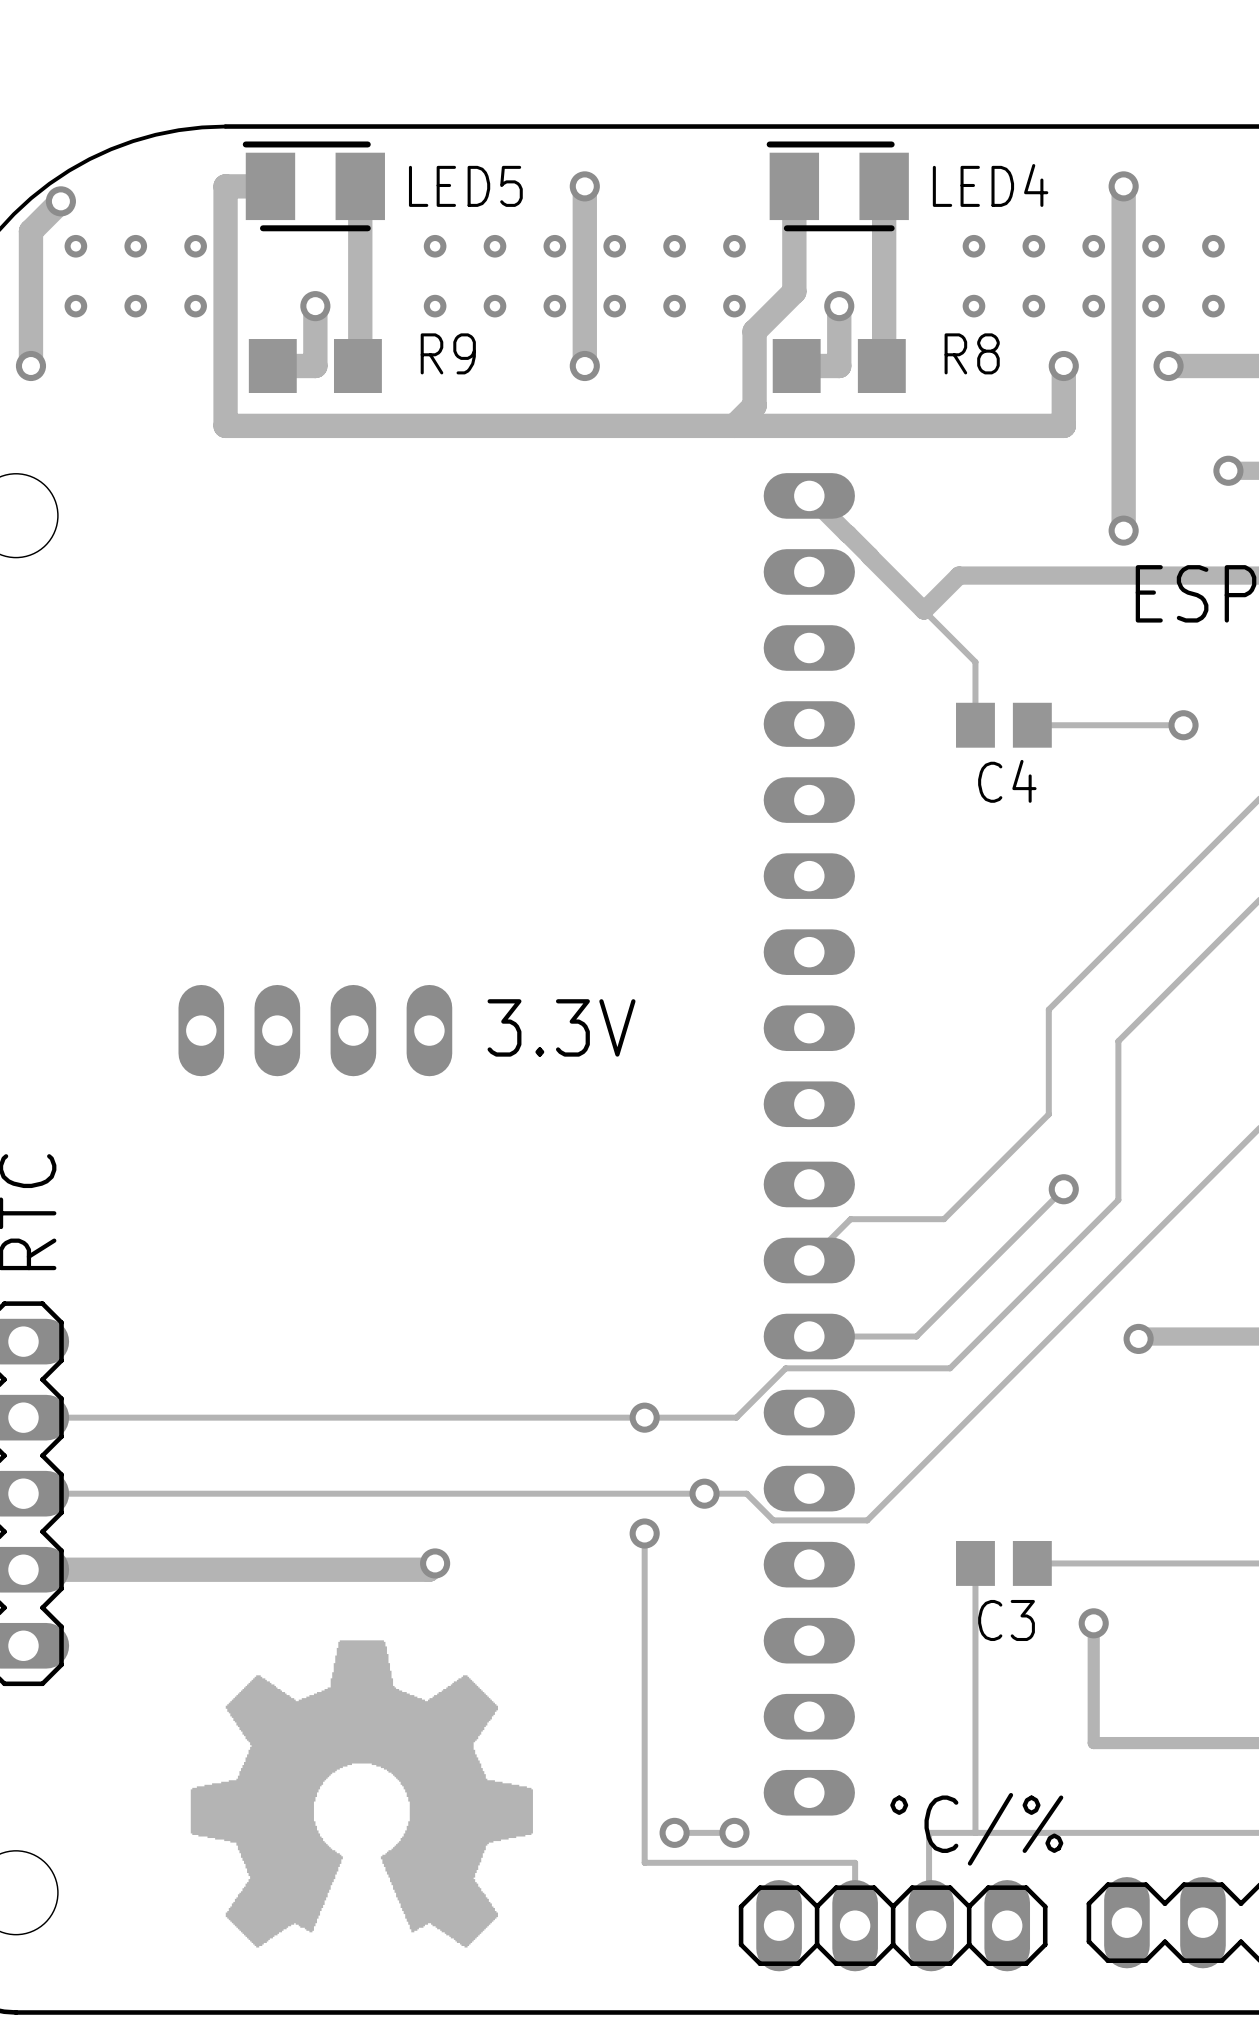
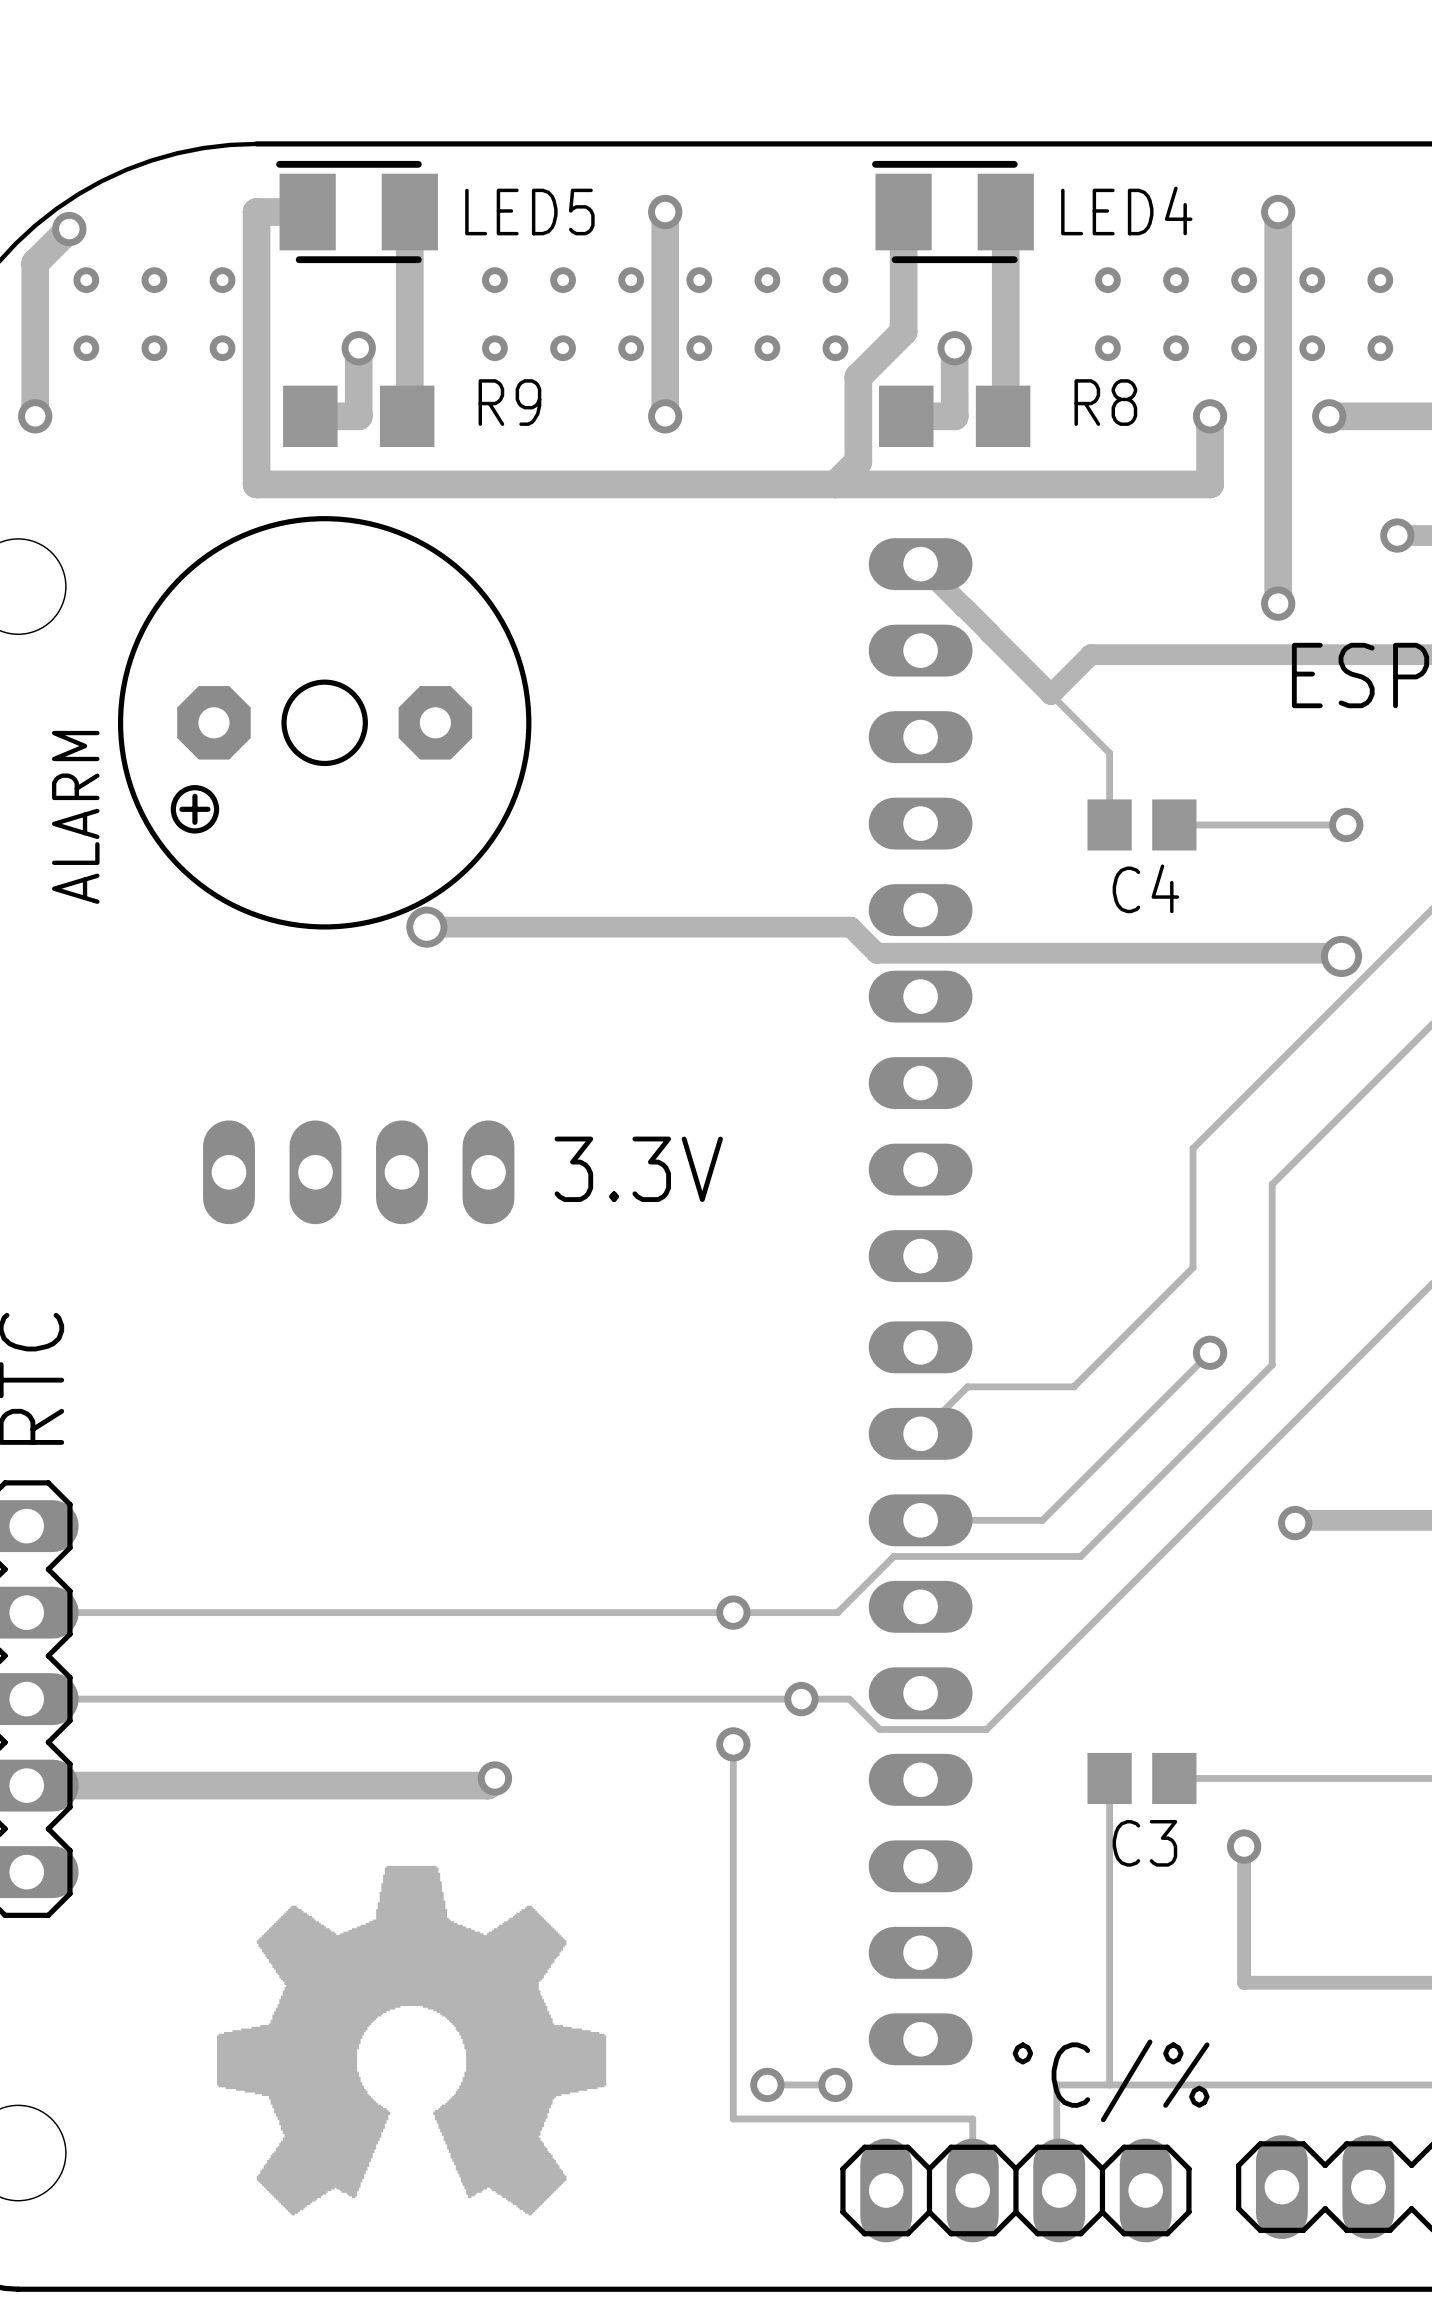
ALARM: none -> (324, 722)
track: none -> (426, 927) (850, 927) (876, 953) (1338, 953) (1346, 961)
via: none -> (426, 927)
via: none -> (1341, 956)

